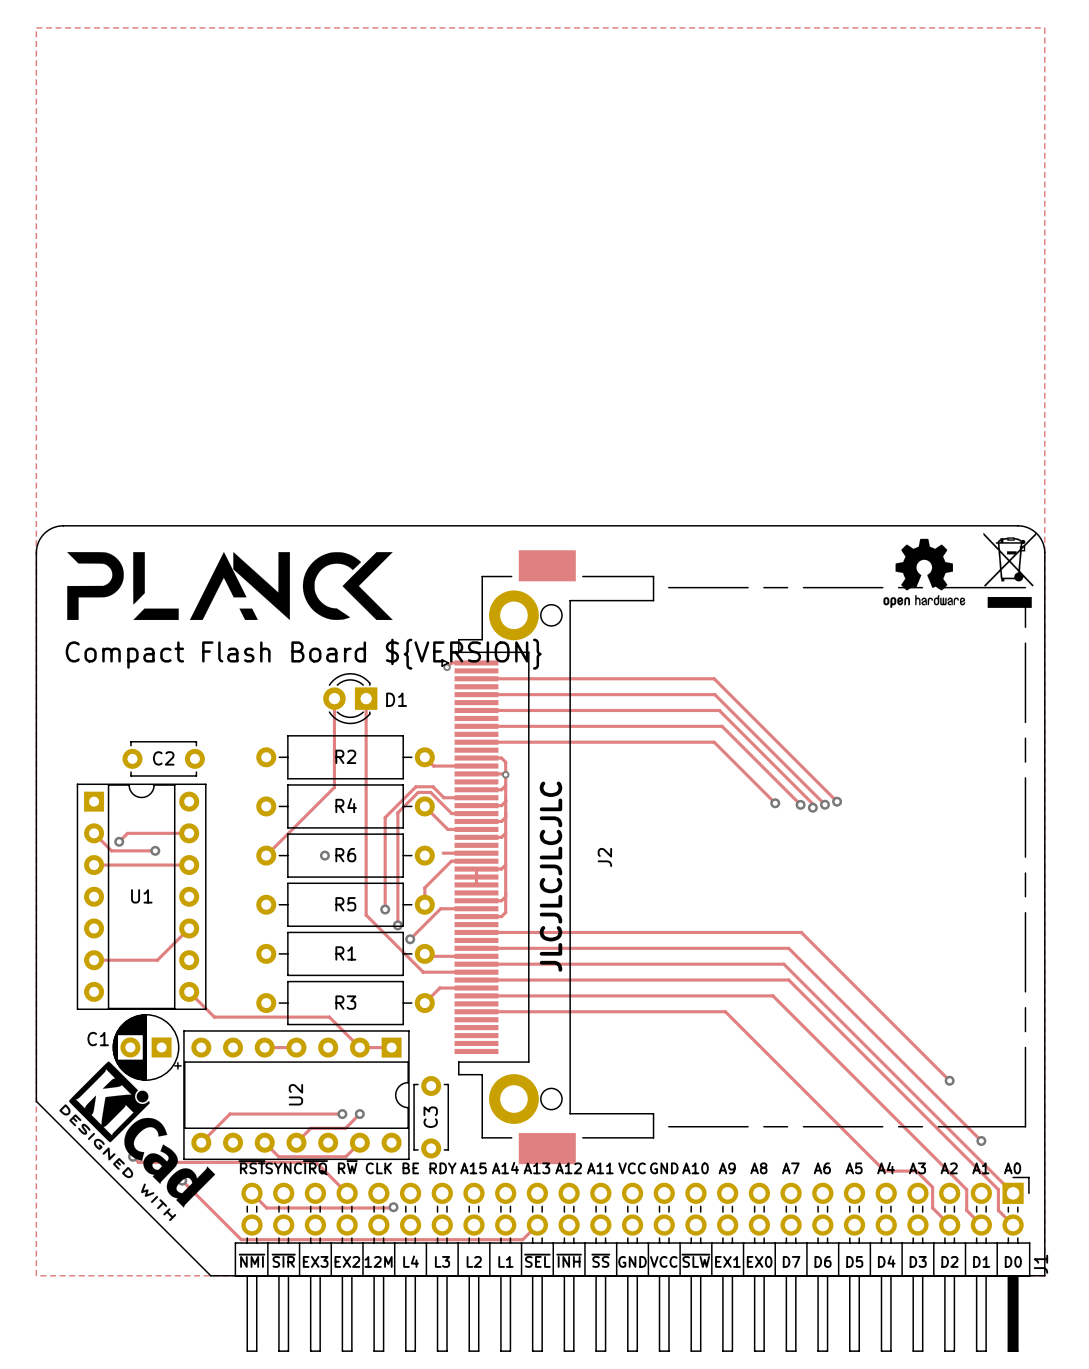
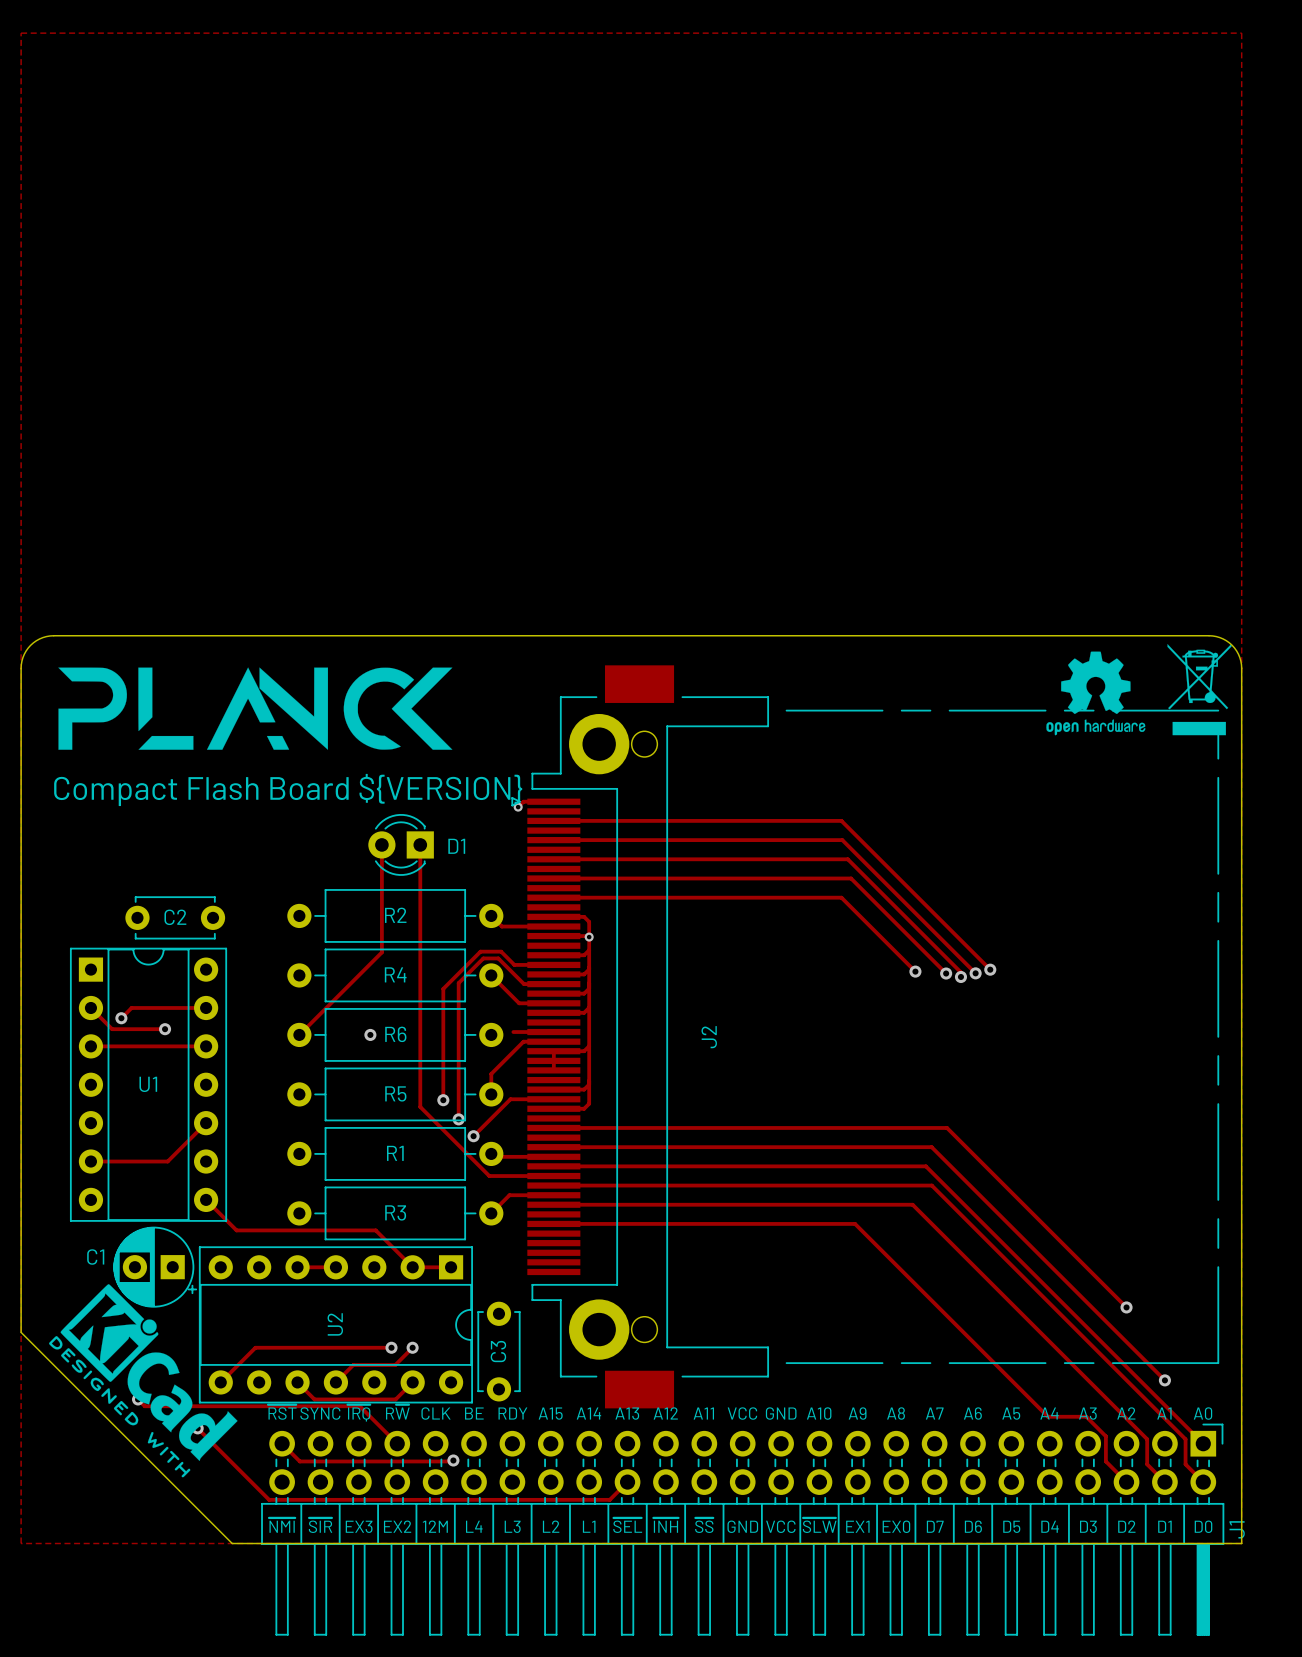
text: JLCJLCJLCJLC (550, 876) -> none

